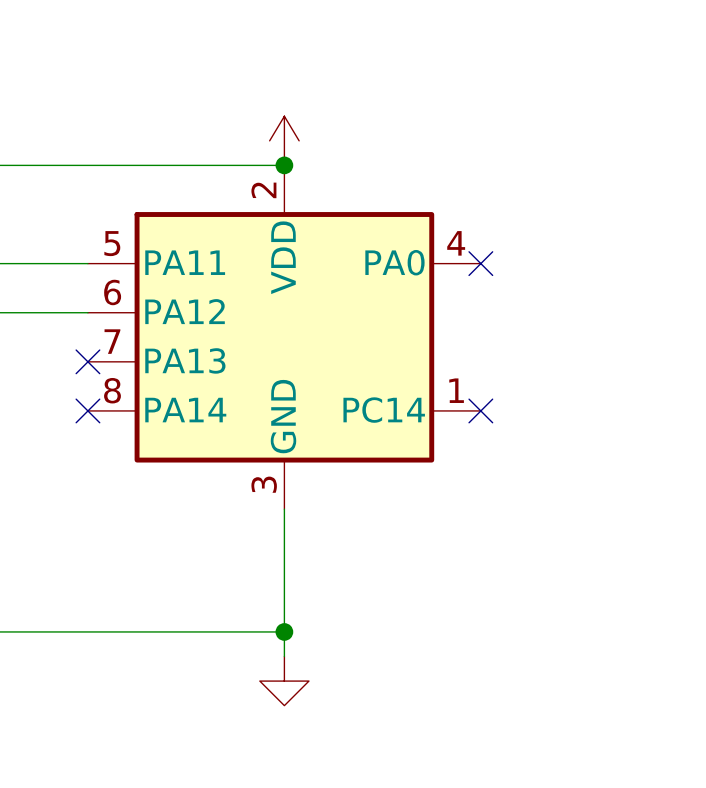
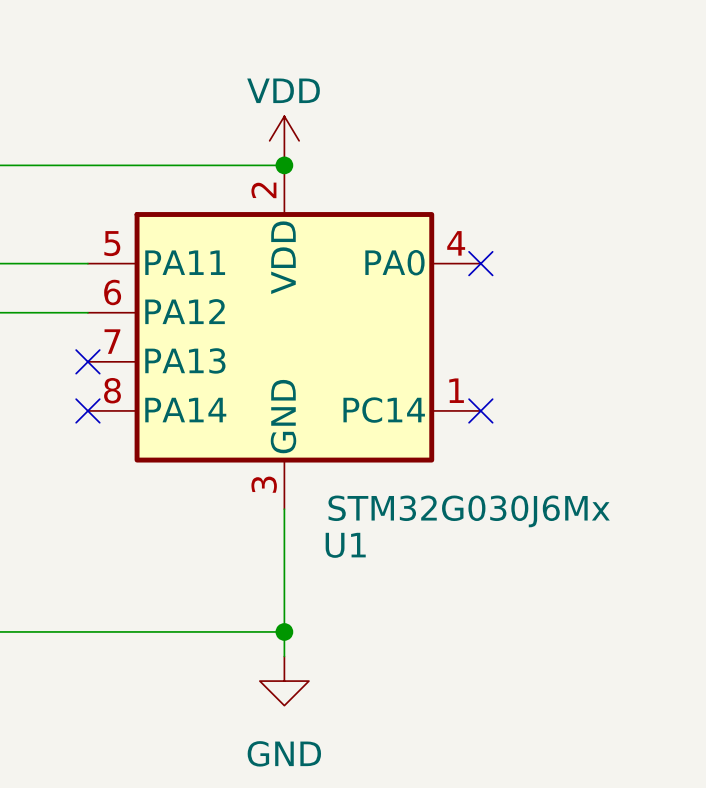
power symbol text: none -> VDD (283, 90)
U1 value: none -> STM32G030J6Mx (469, 511)
U1 name: none -> U1 (345, 545)
power symbol text: none -> GND (284, 753)

